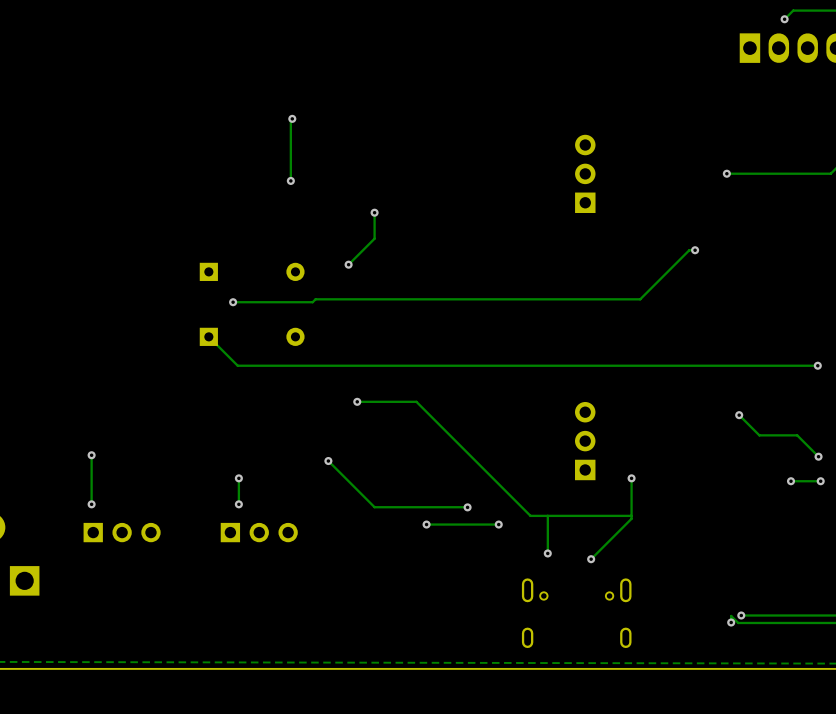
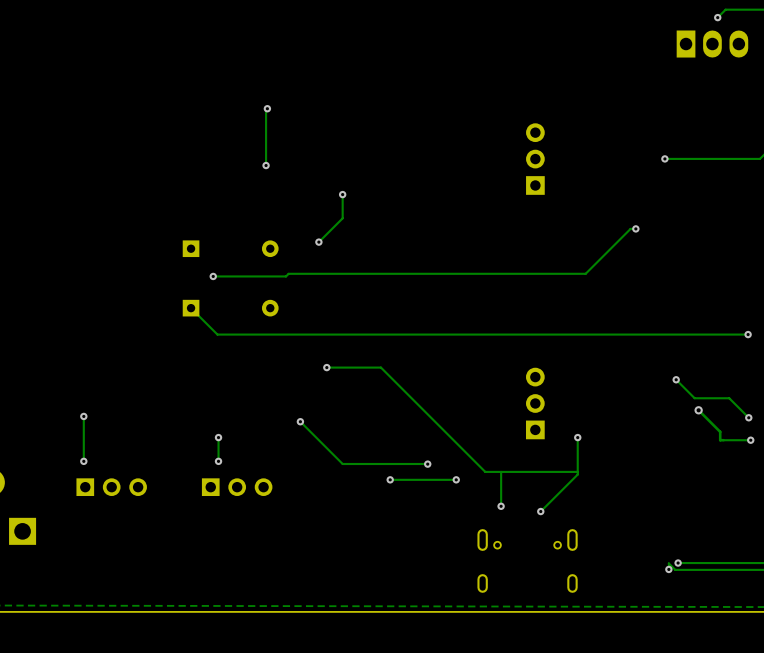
track: none -> (698, 410) (720, 431) (720, 440) (723, 440)
via: none -> (698, 410)
via: (790, 481) -> none

